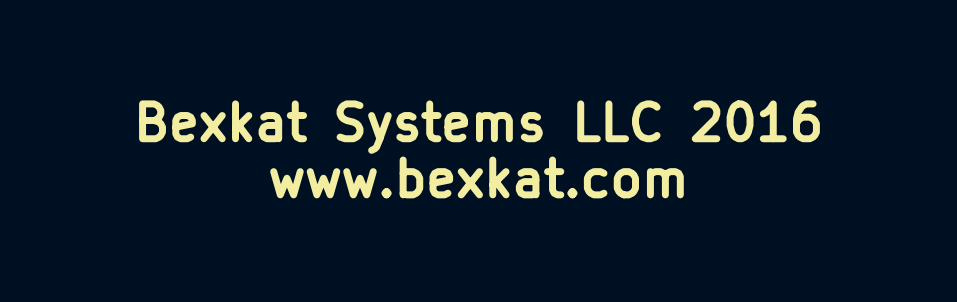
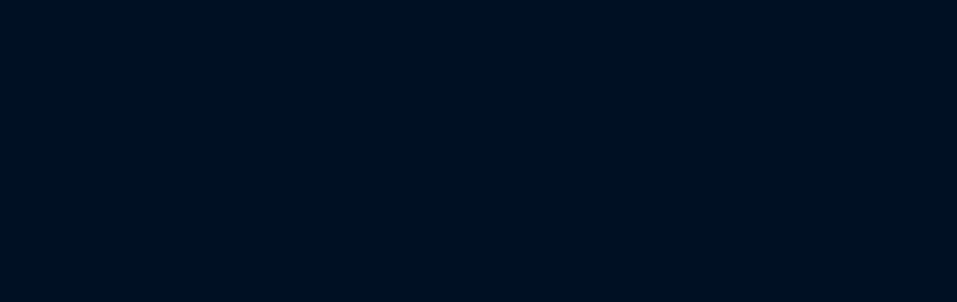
text: Bexkat Systems LLC 2016 (479, 127) -> none
text: www.bexkat.com (477, 177) -> none

